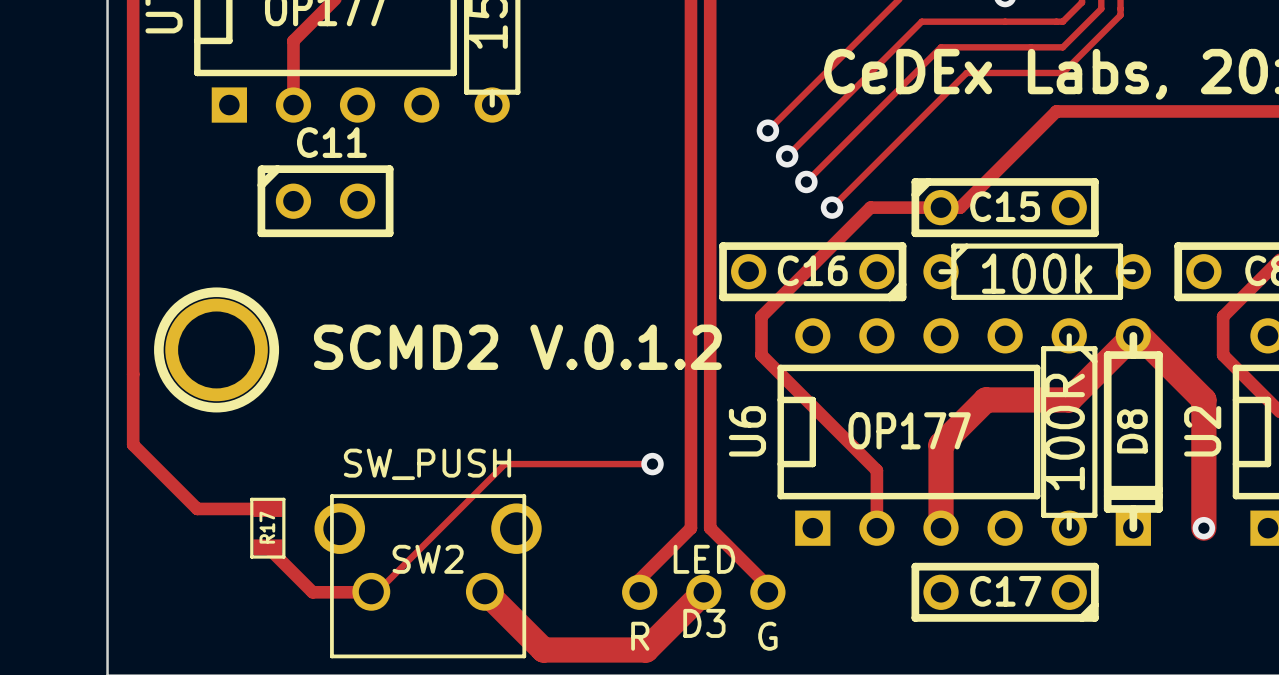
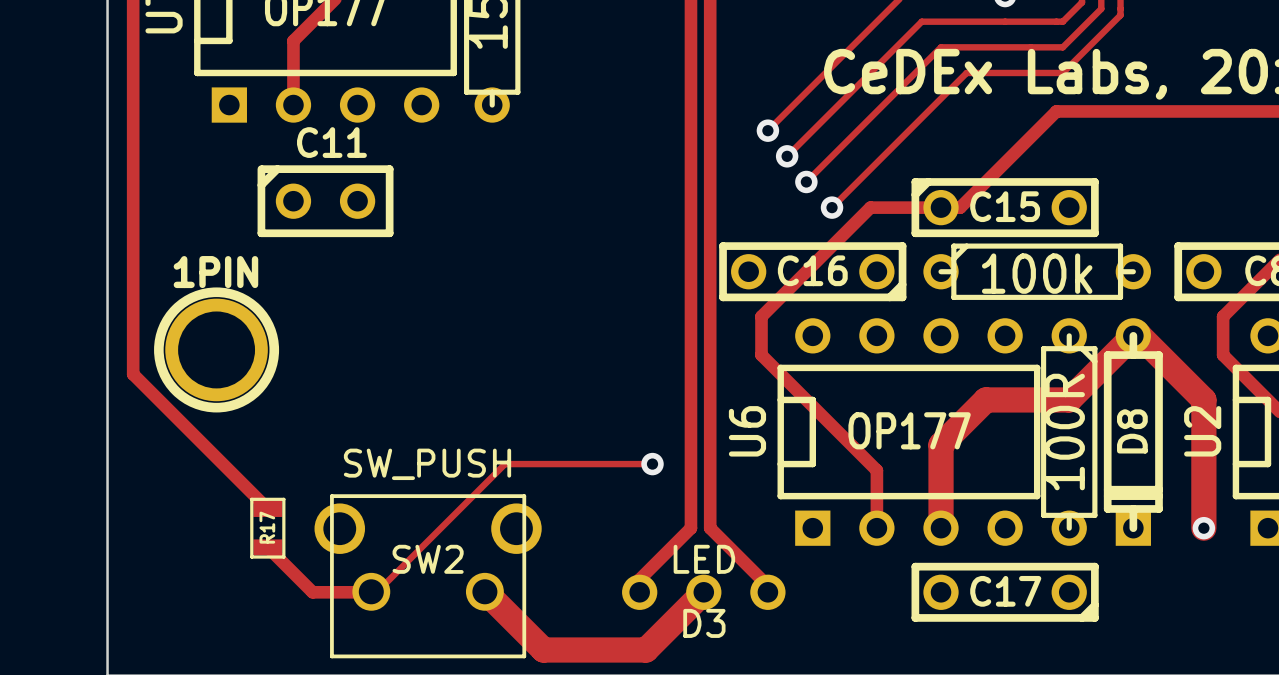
1PIN name: none -> 1PIN (215, 272)
text: SCMD2 V.0.1.2 (517, 347) -> none
track: (133, 374) (133, 444) (197, 508) (267, 508) -> (133, 374) (267, 508)
text: R (640, 636) -> none
text: G (767, 636) -> none

